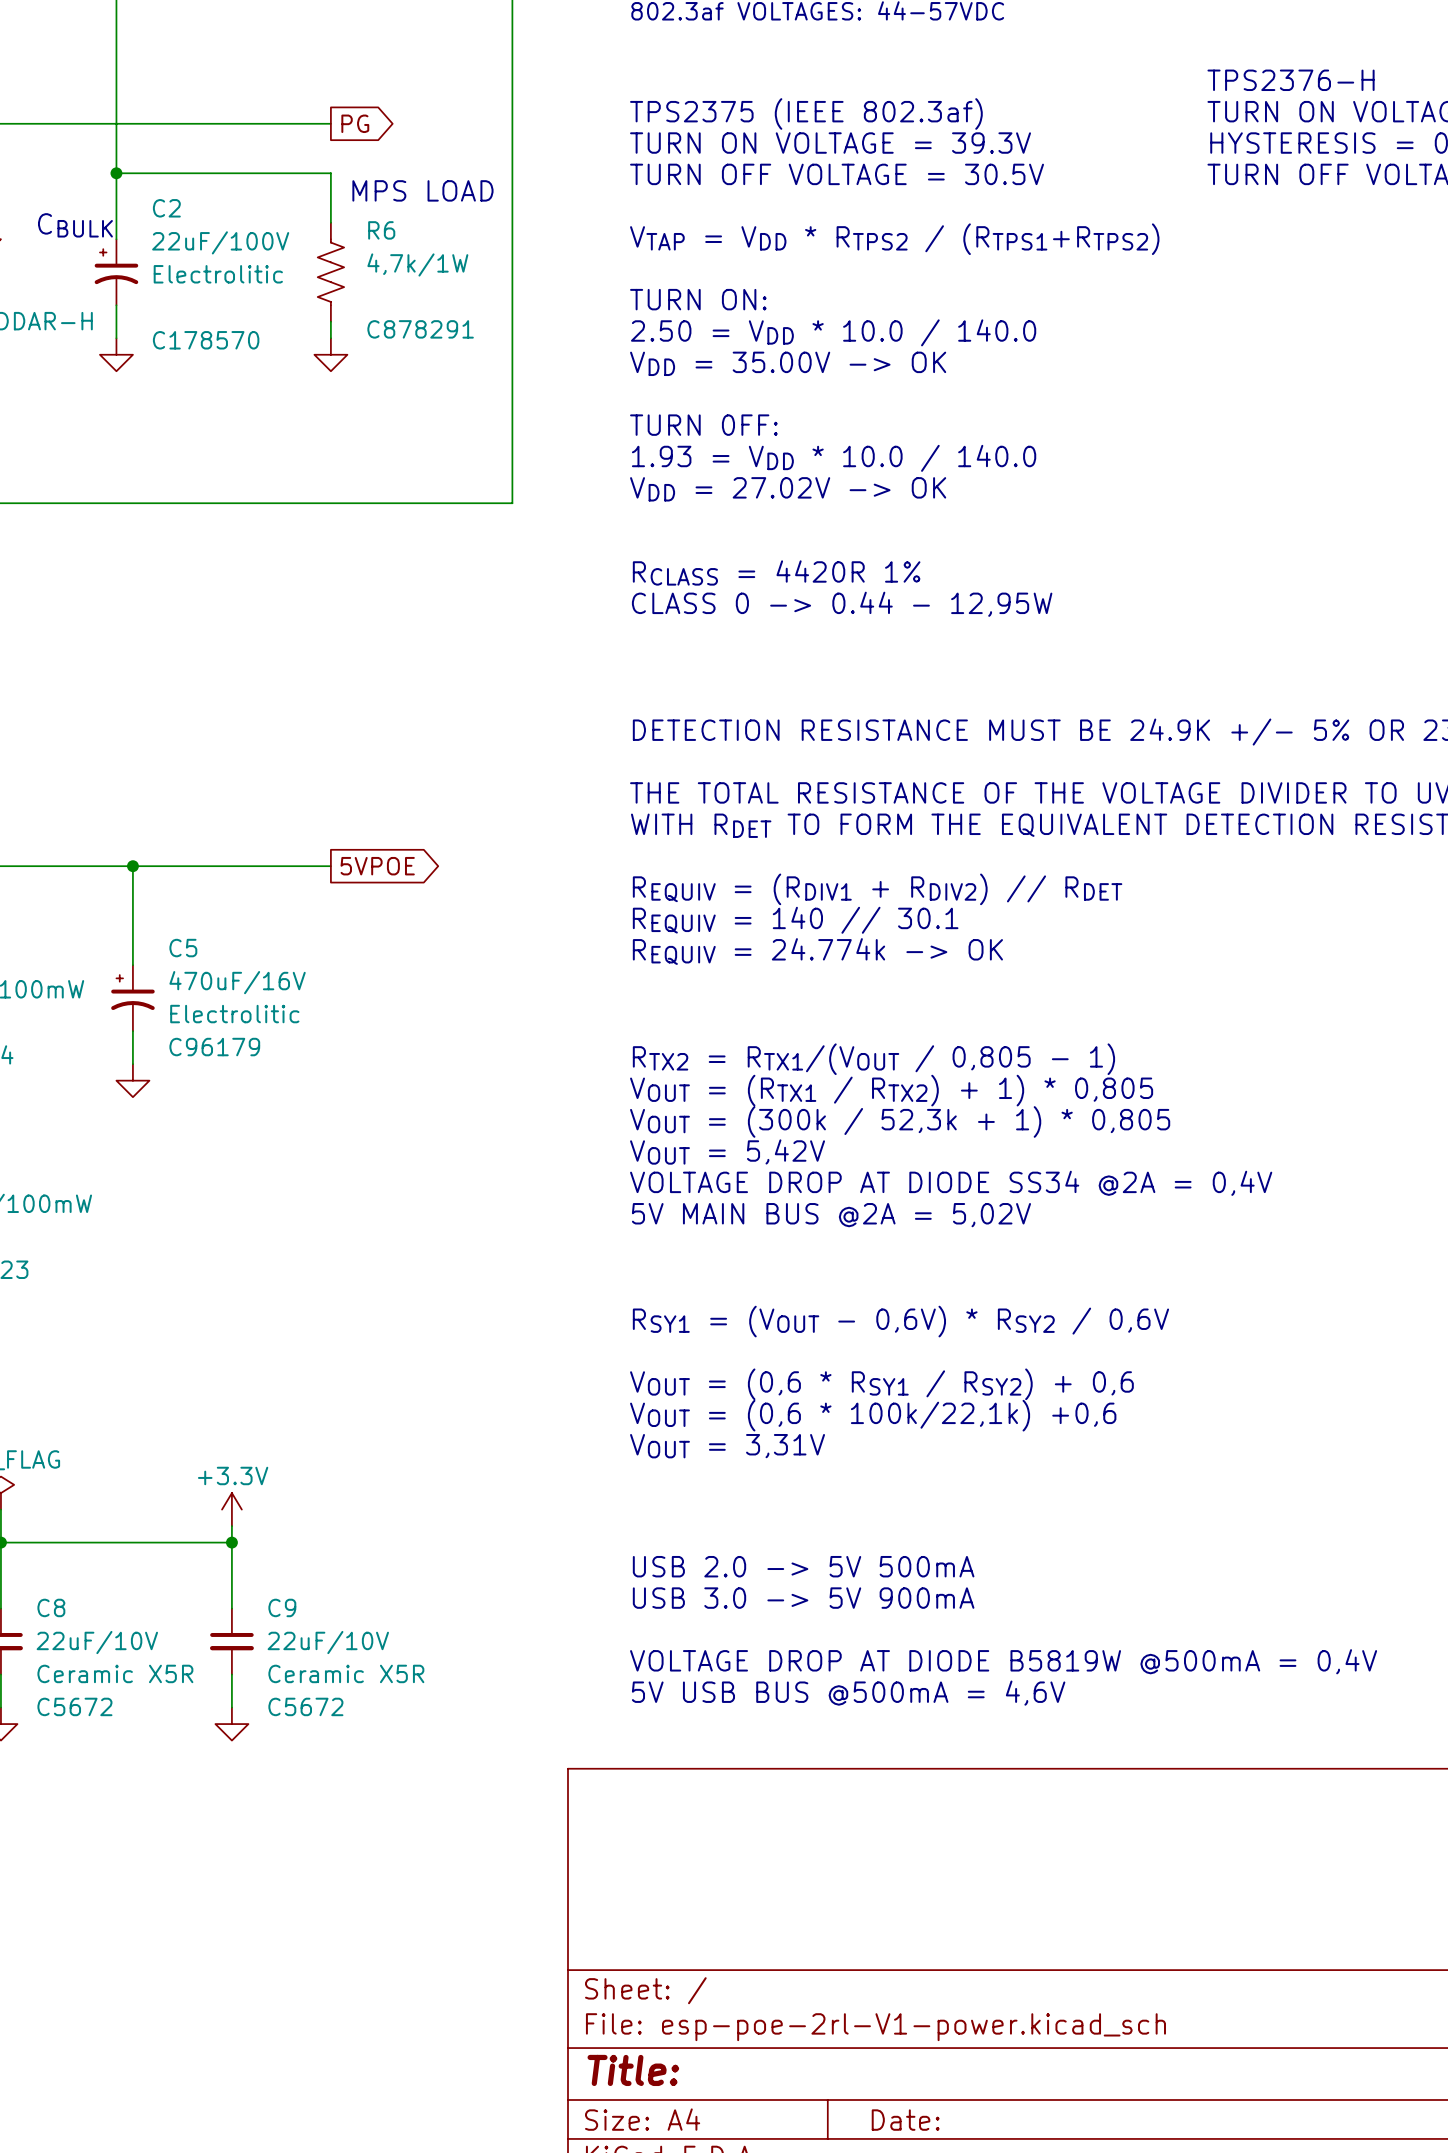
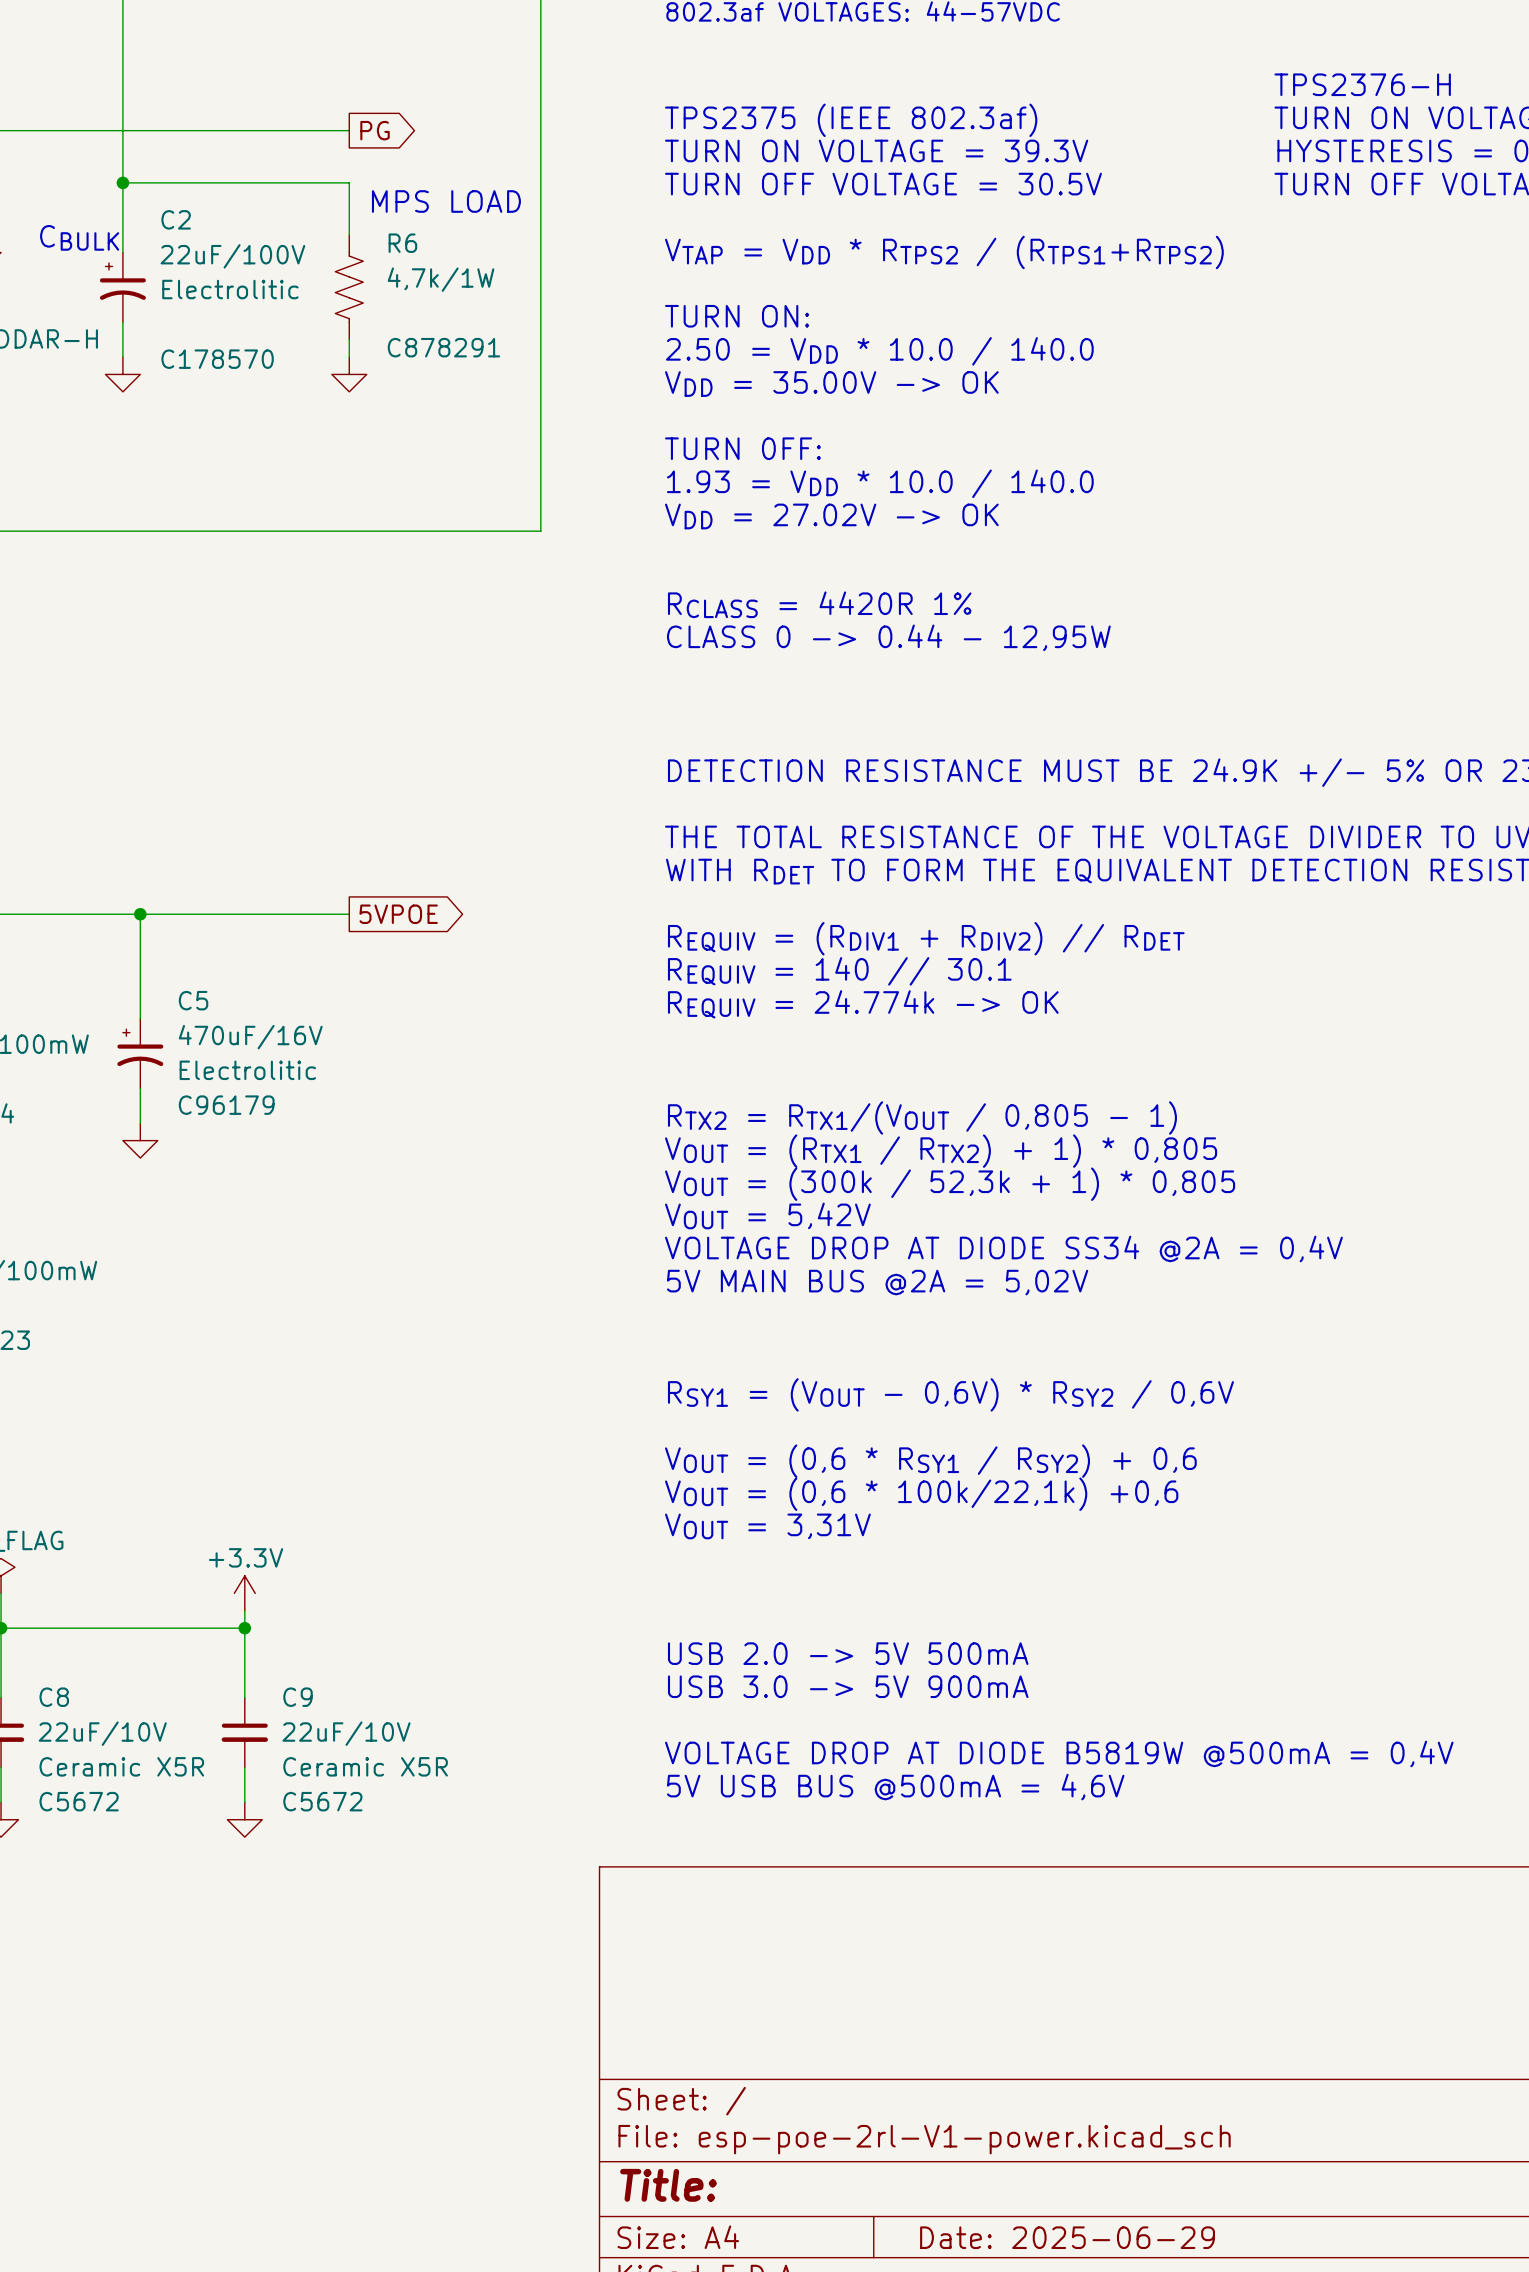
title block: Date: (905, 2120) -> Date: 2025-06-29 (1067, 2237)

